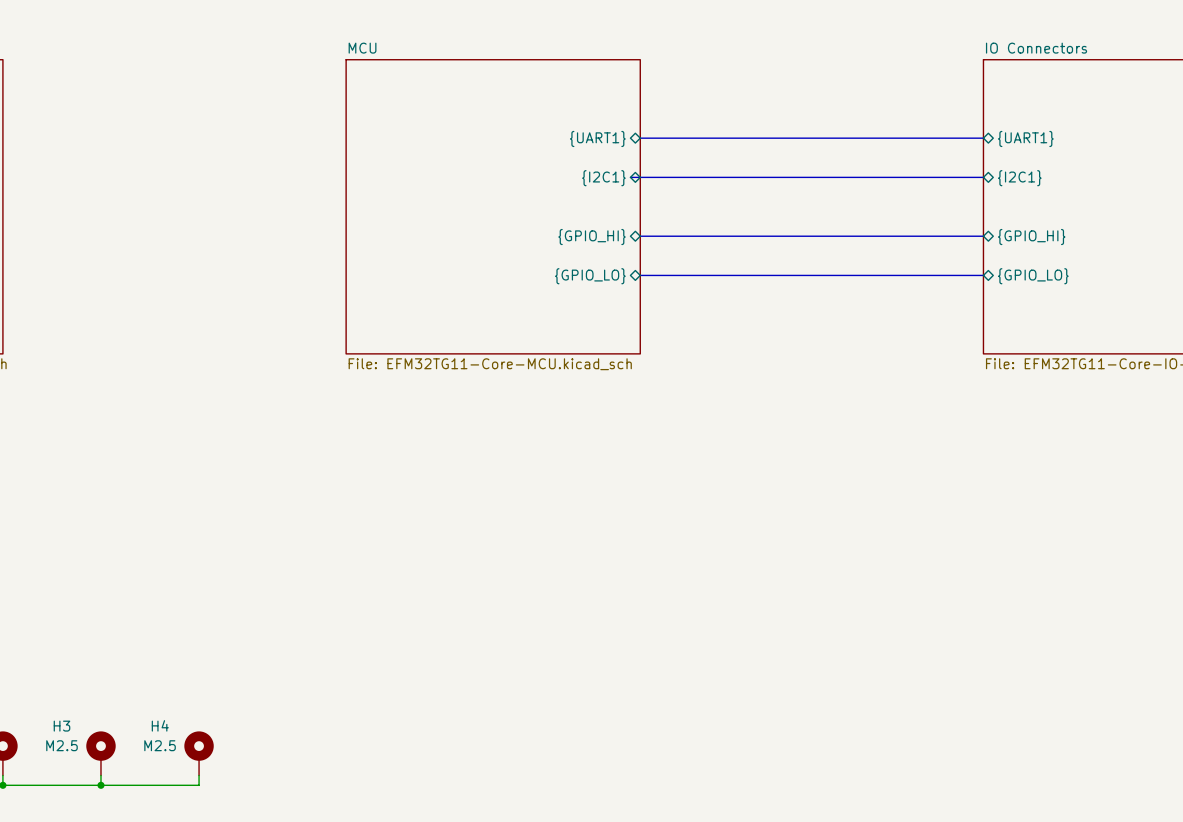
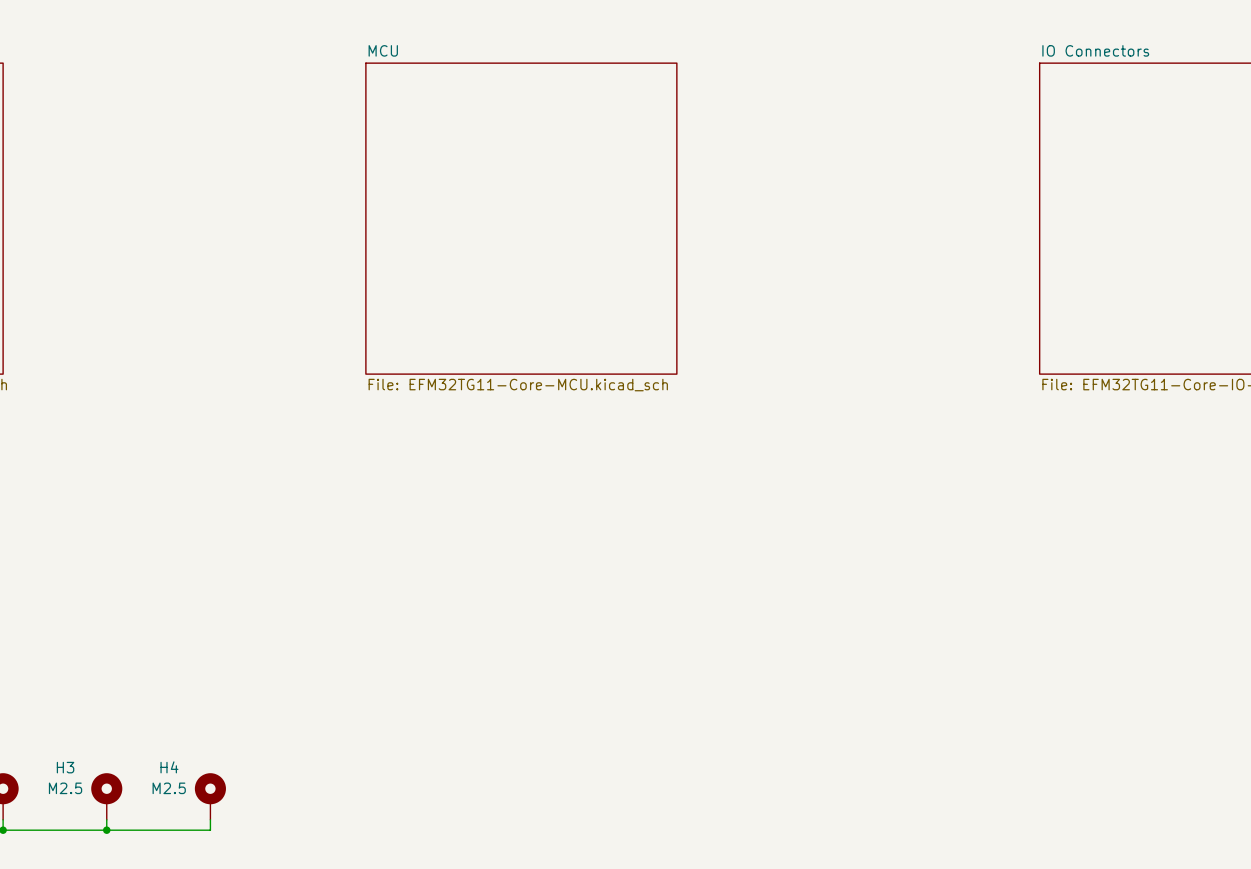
sheet pin: {UART1} (597, 138) -> none
bus: (640, 138) (983, 138) -> none
sheet pin: {UART1} (1025, 138) -> none
bus: (630, 177) (983, 177) -> none
sheet pin: {I2C1} (603, 178) -> none
sheet pin: {I2C1} (1019, 178) -> none
bus: (640, 236) (983, 236) -> none
sheet pin: {GPIO_HI} (592, 237) -> none
sheet pin: {GPIO_HI} (1031, 237) -> none
bus: (640, 275) (983, 275) -> none
sheet pin: {GPIO_LO} (590, 276) -> none
sheet pin: {GPIO_LO} (1033, 276) -> none

